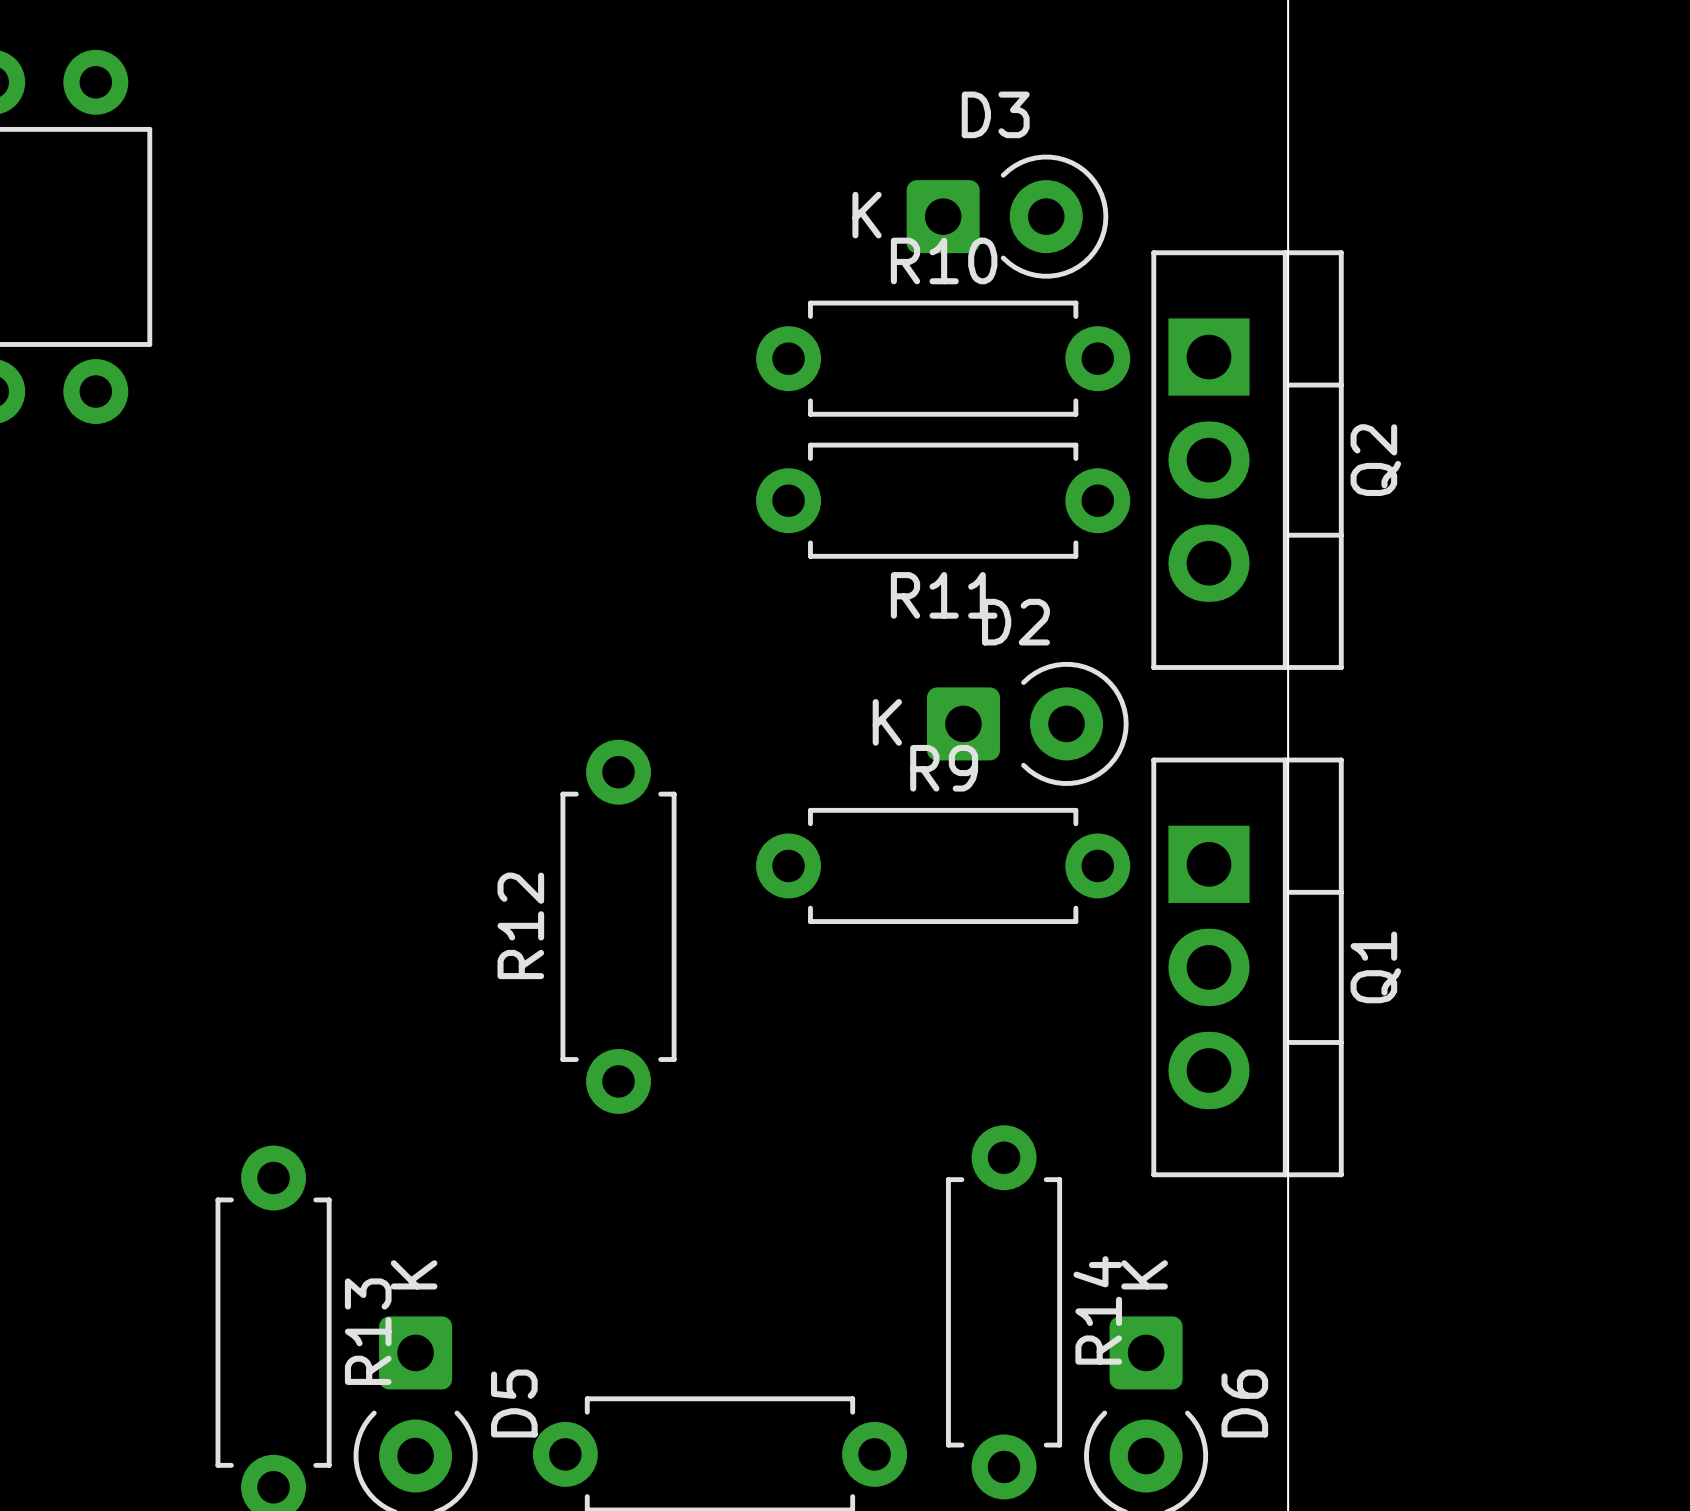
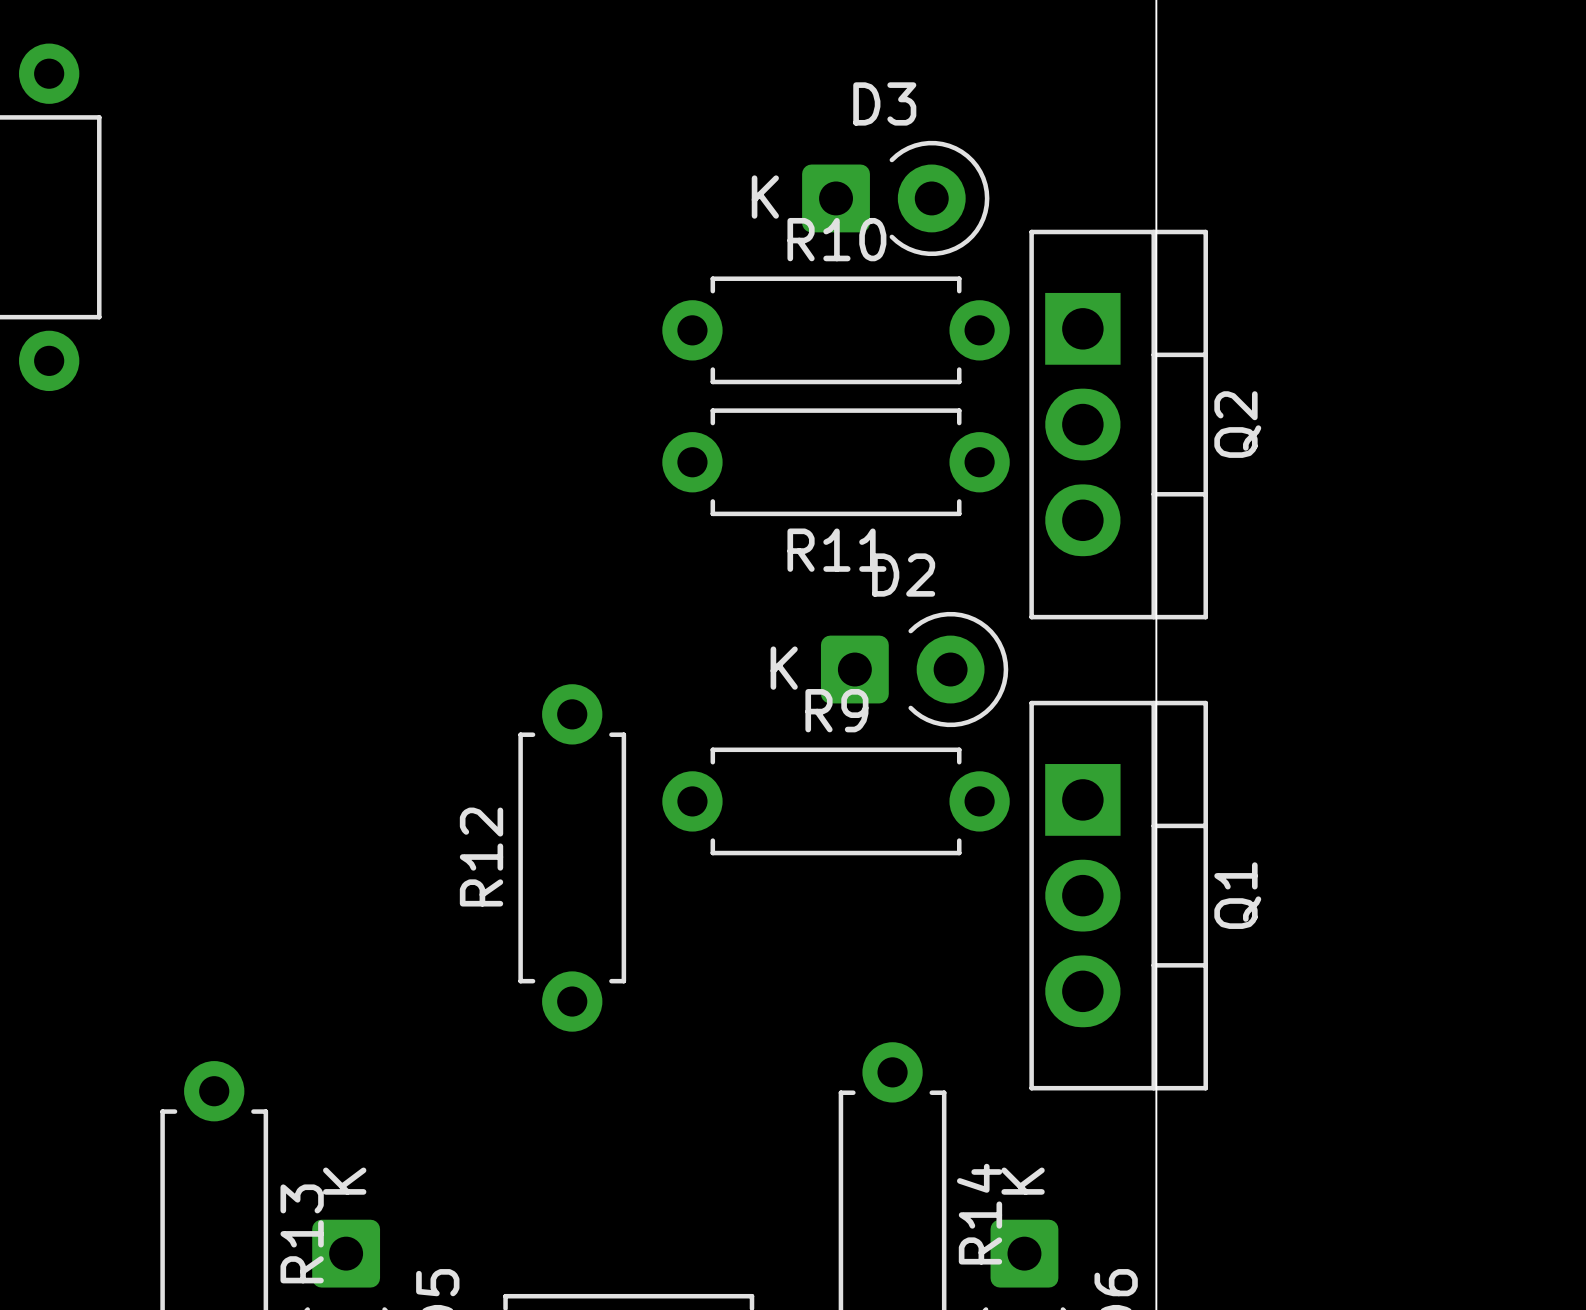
R12 position: (618, 926) -> (572, 857)

